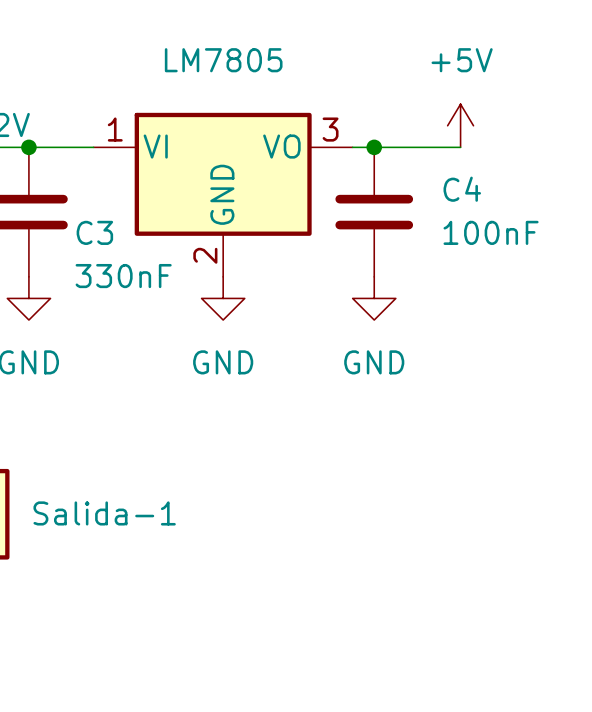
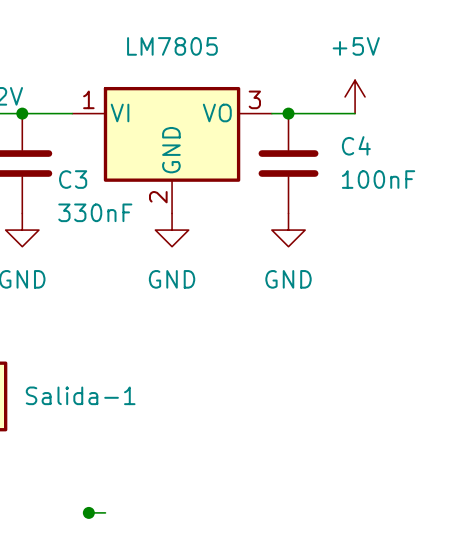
wire: none -> (88, 512) (105, 512)
junction: none -> (88, 512)

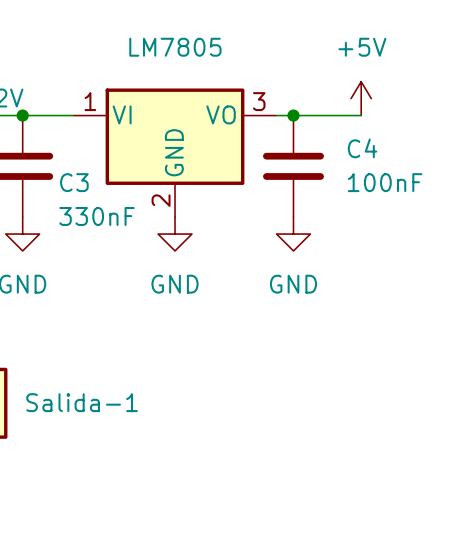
wire: (88, 512) (105, 512) -> none
junction: (88, 512) -> none

